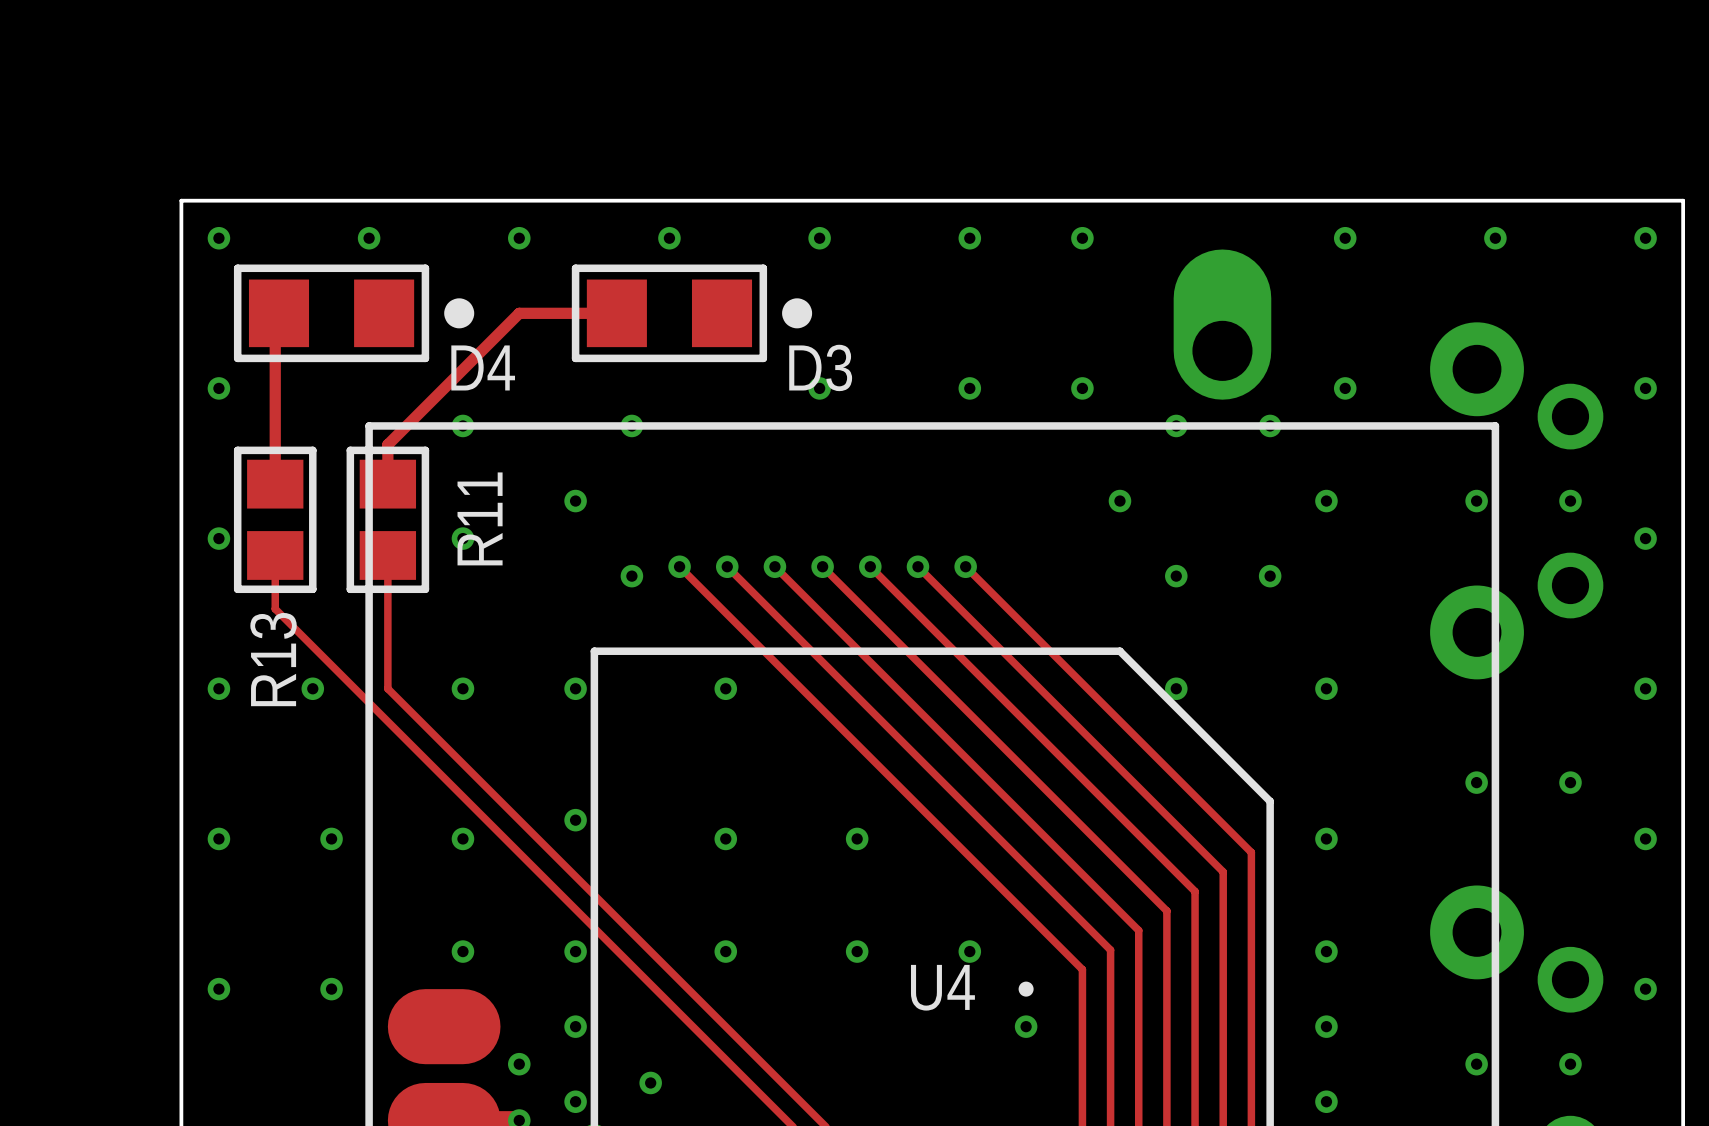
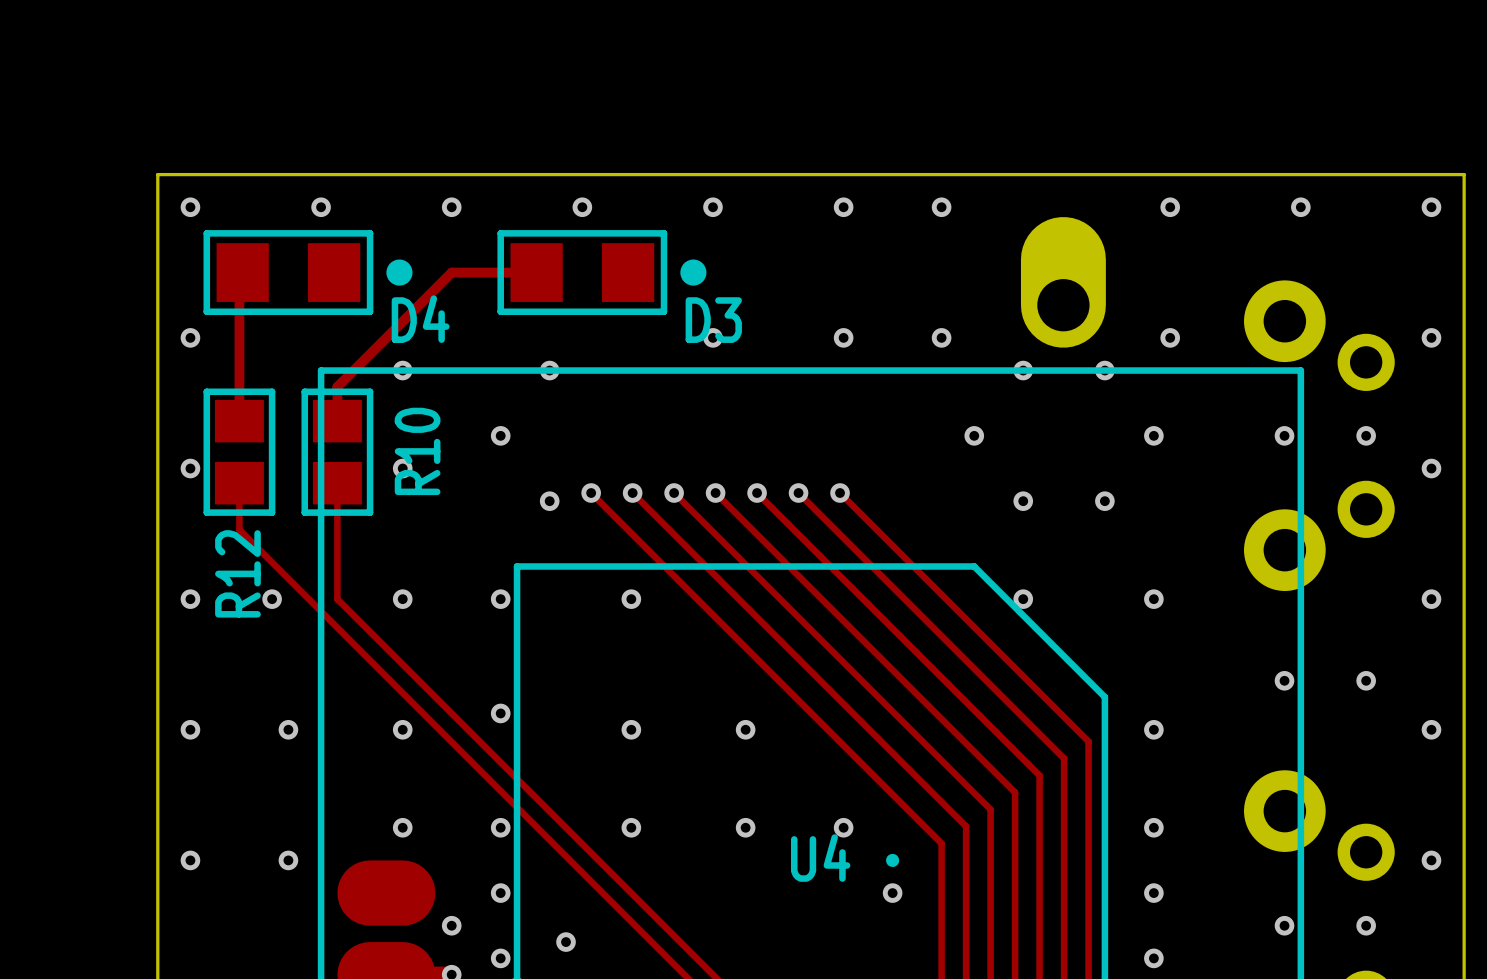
R11 name: R11 (480, 518) -> R10 (417, 451)
R13 name: R13 (273, 659) -> R12 (237, 573)

